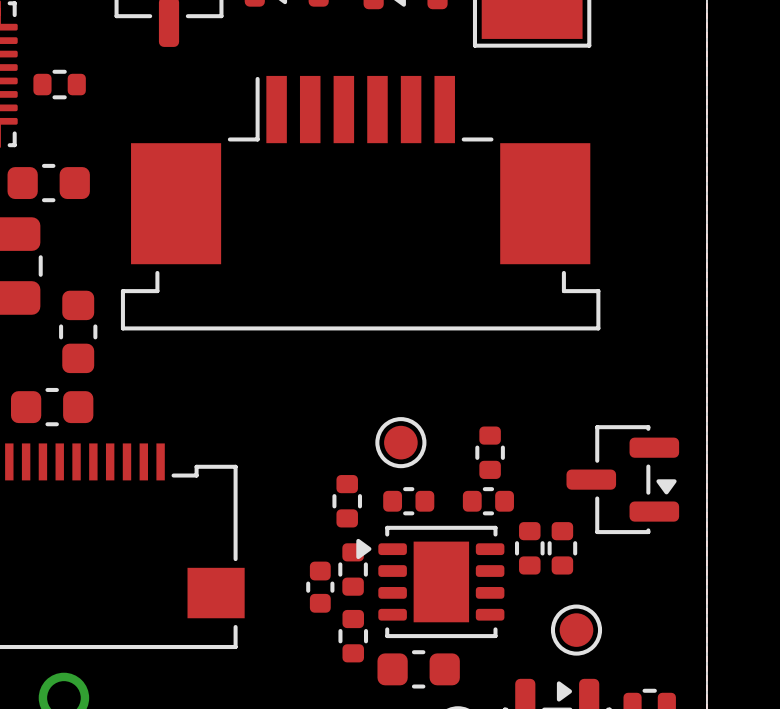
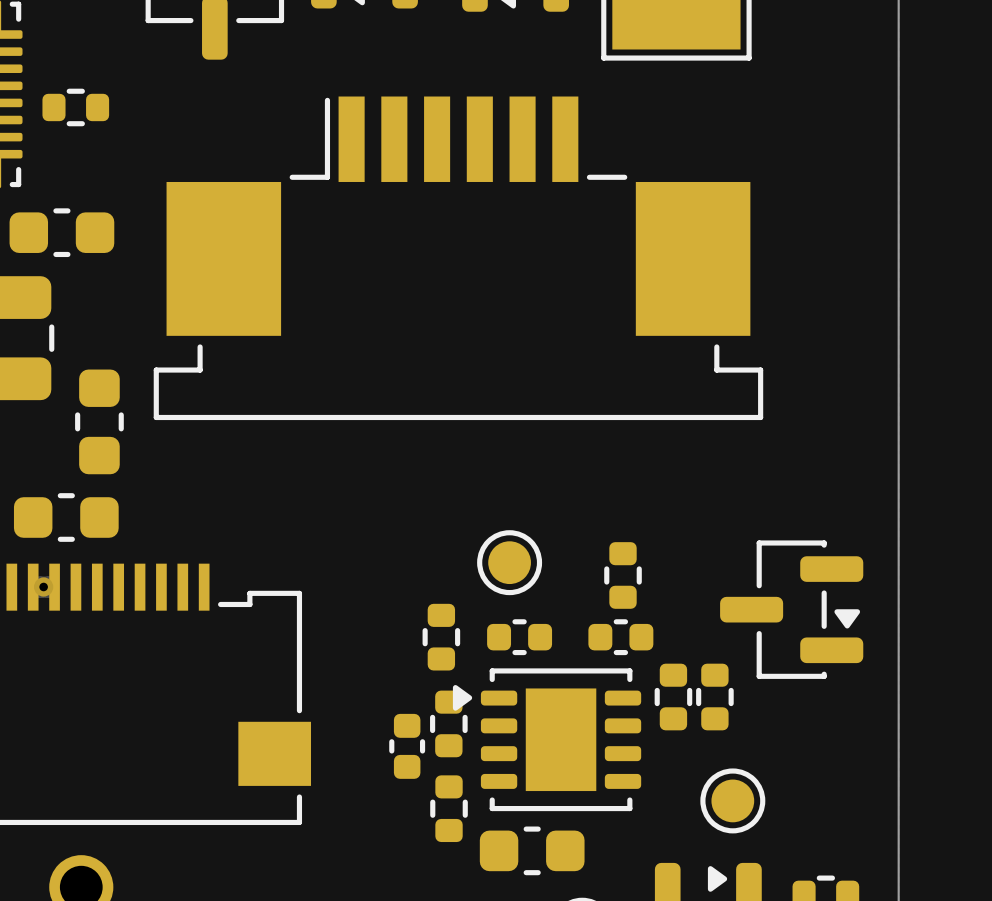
via: none -> (43, 586)

